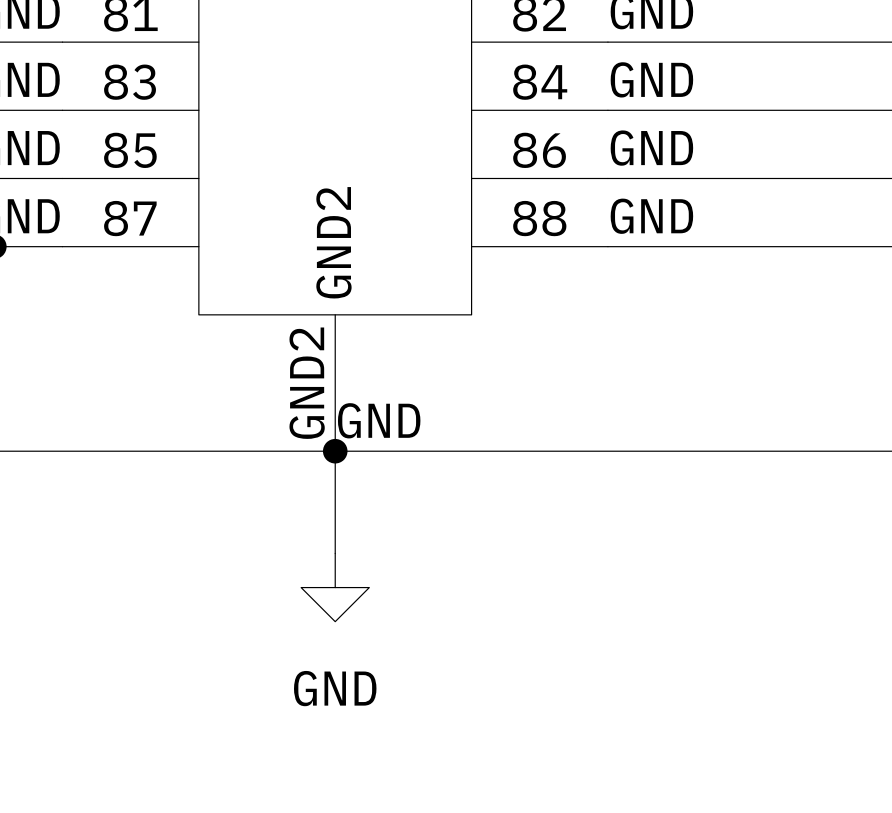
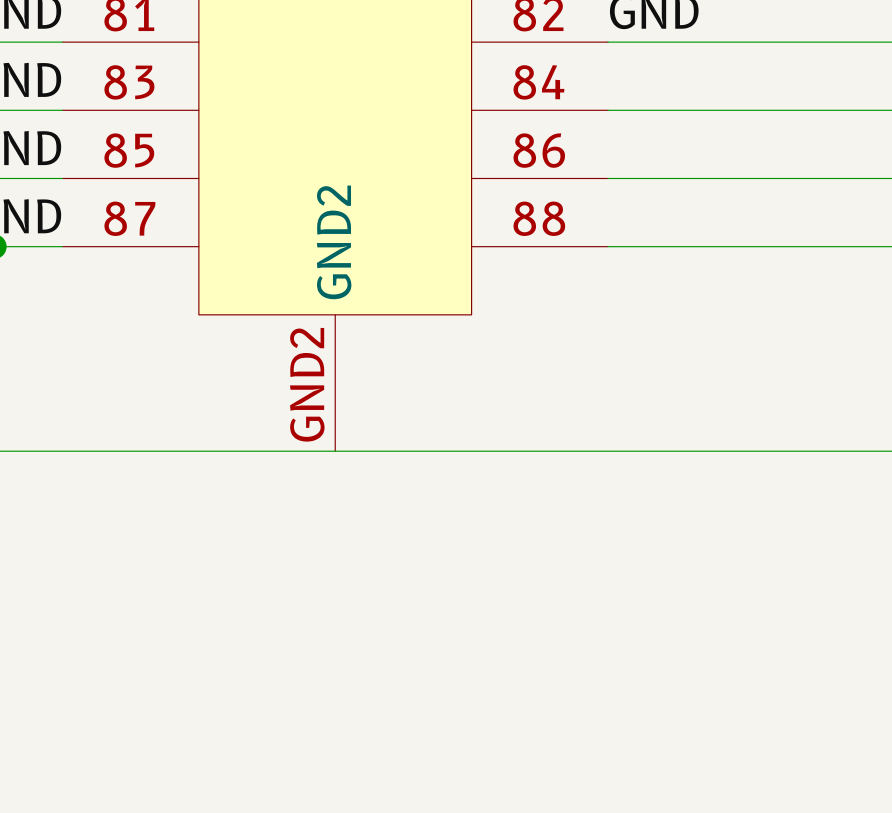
label: GND (651, 79) -> none
label: GND (651, 148) -> none
label: GND (651, 216) -> none
label: GND (379, 420) -> none
wire: (335, 451) (335, 553) -> none
junction: (335, 451) -> none
power symbol: GND (335, 587) -> none

